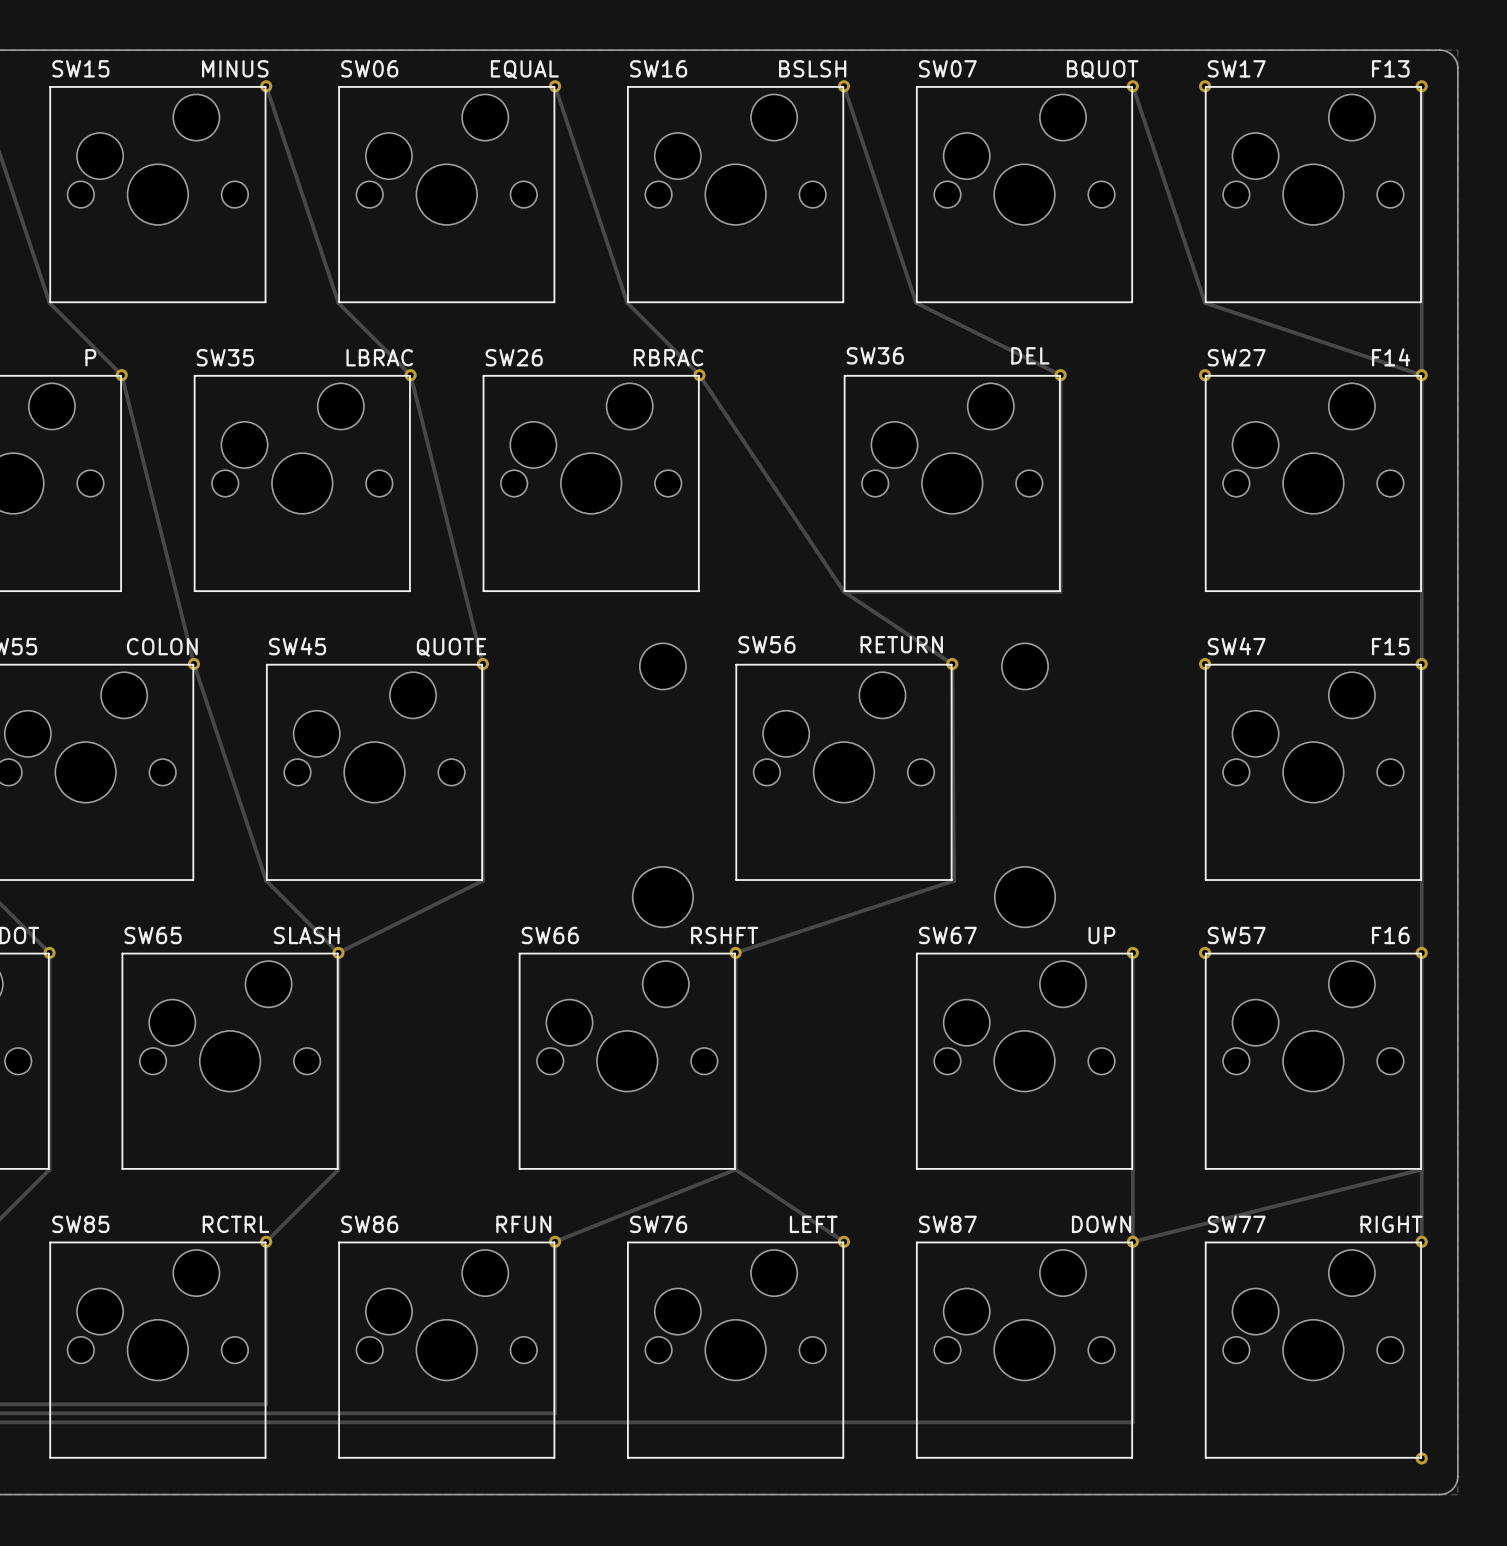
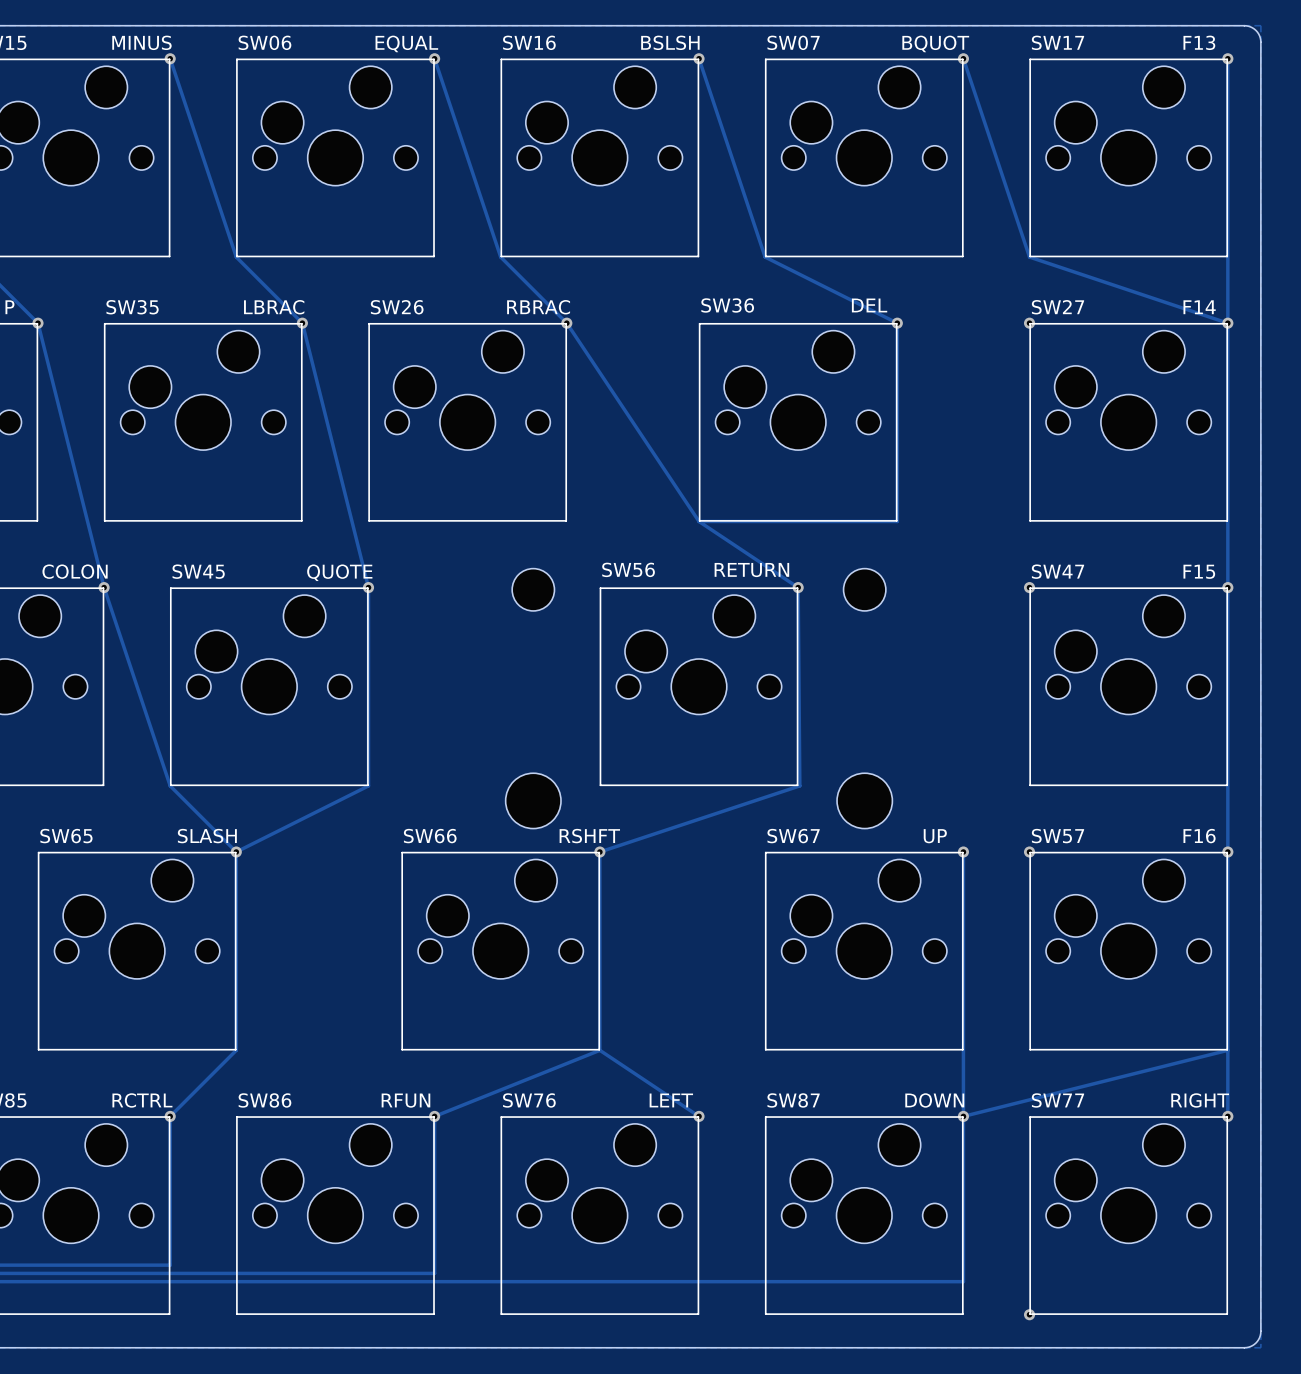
via: (1205, 86) -> none
via: none -> (1029, 1314)
via: (1421, 1458) -> none

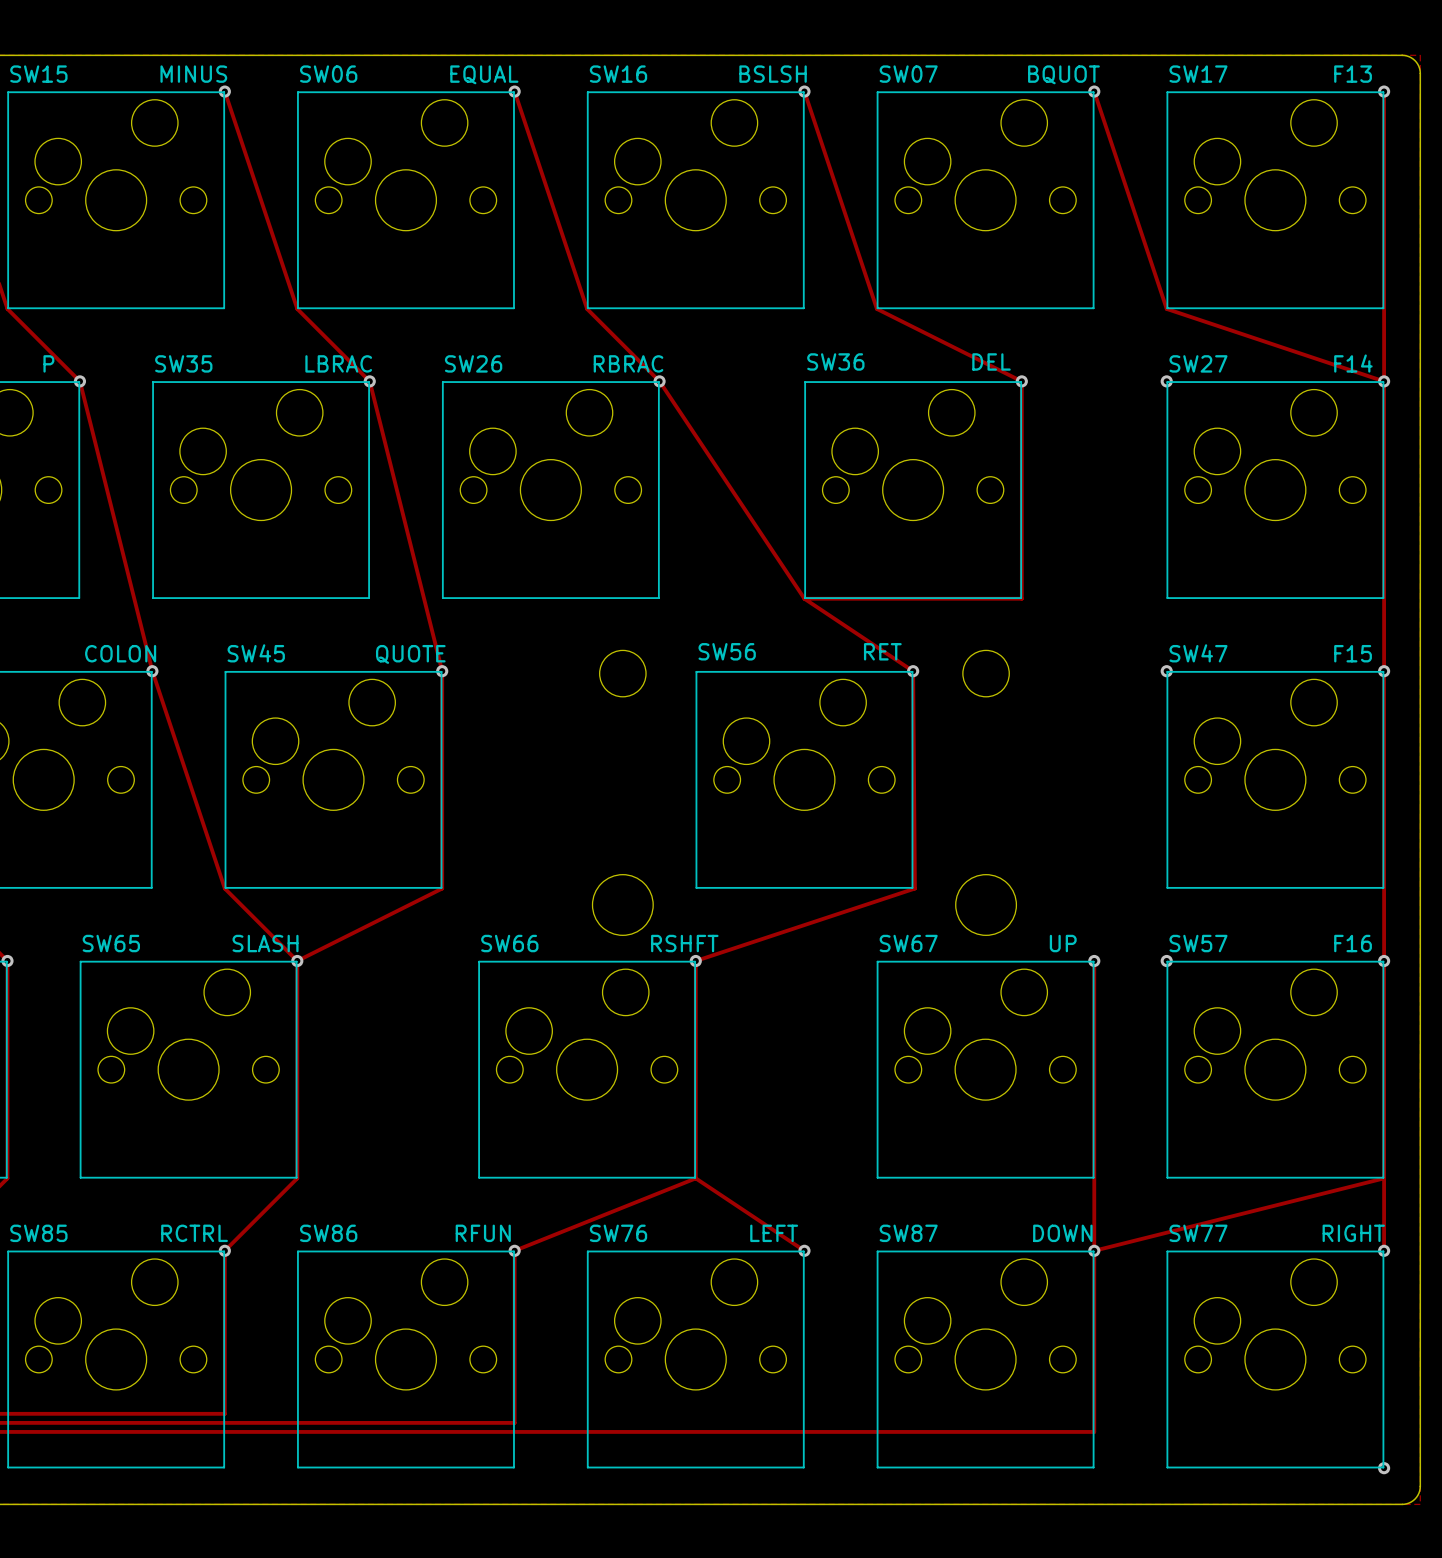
SW56 value: RETURN (751, 570) -> RET (882, 651)
via: (1029, 1314) -> none
via: none -> (1384, 1468)

